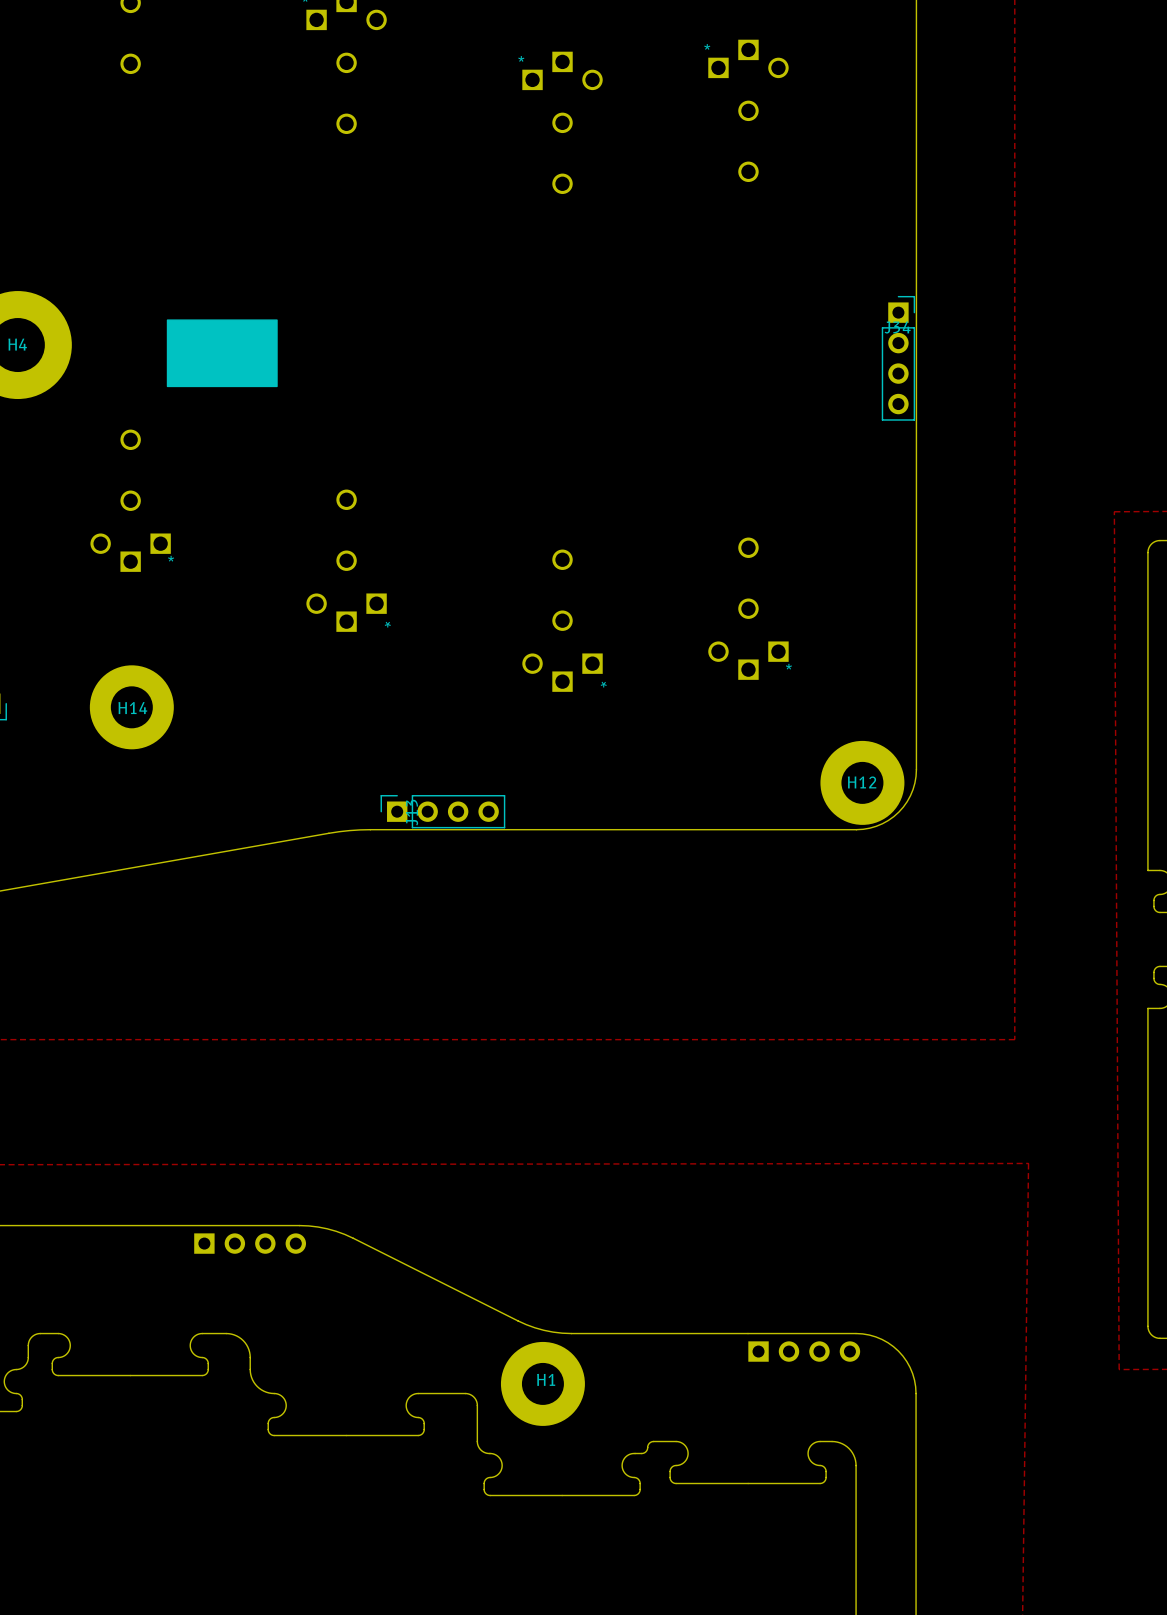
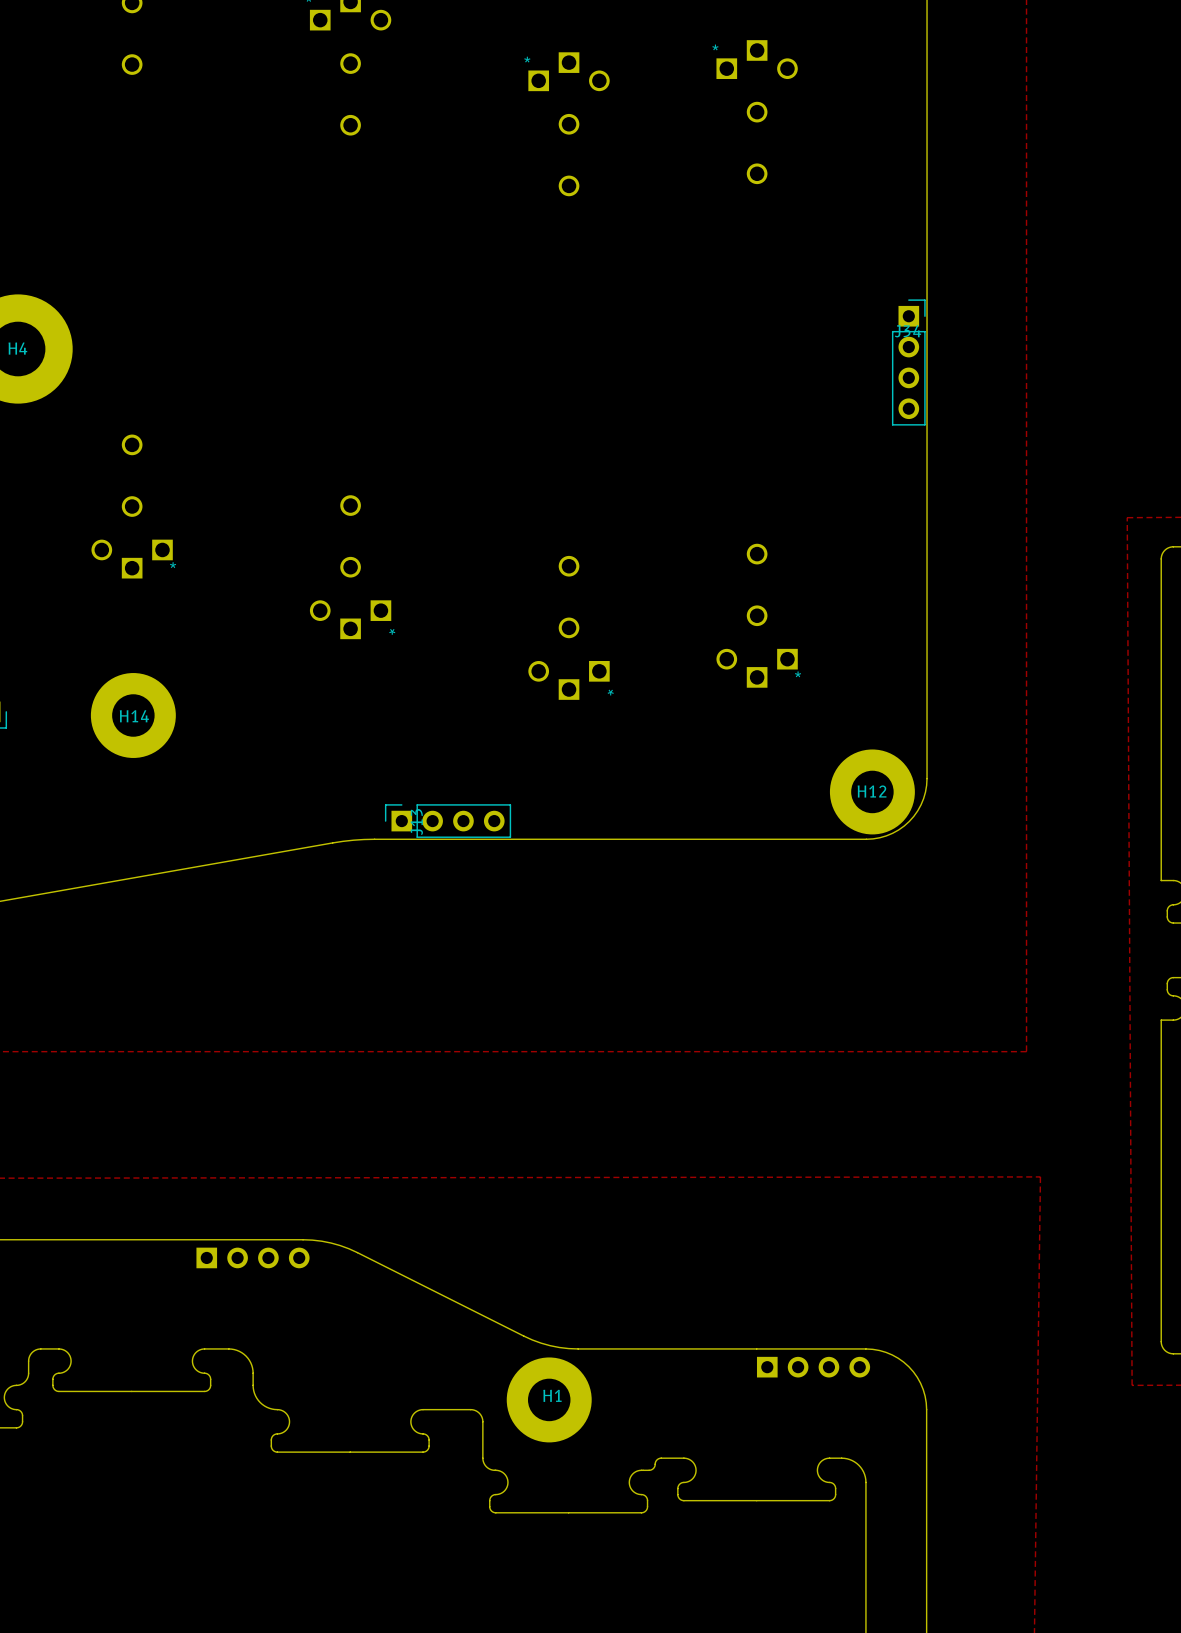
drawing: [166, 319, 278, 388] -> none

